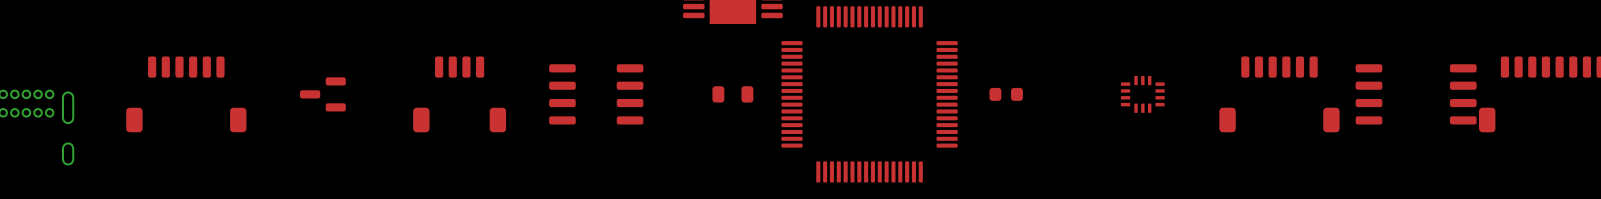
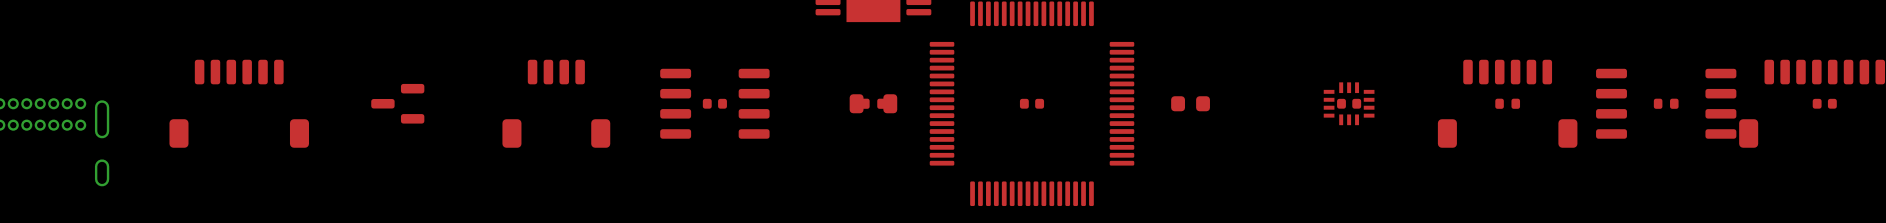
part: none -> (714, 103)
part: none -> (873, 103)
part: none -> (1032, 103)
part: none -> (1349, 103)
part: none -> (1507, 103)
part: none -> (1666, 103)
part: none -> (1824, 103)

